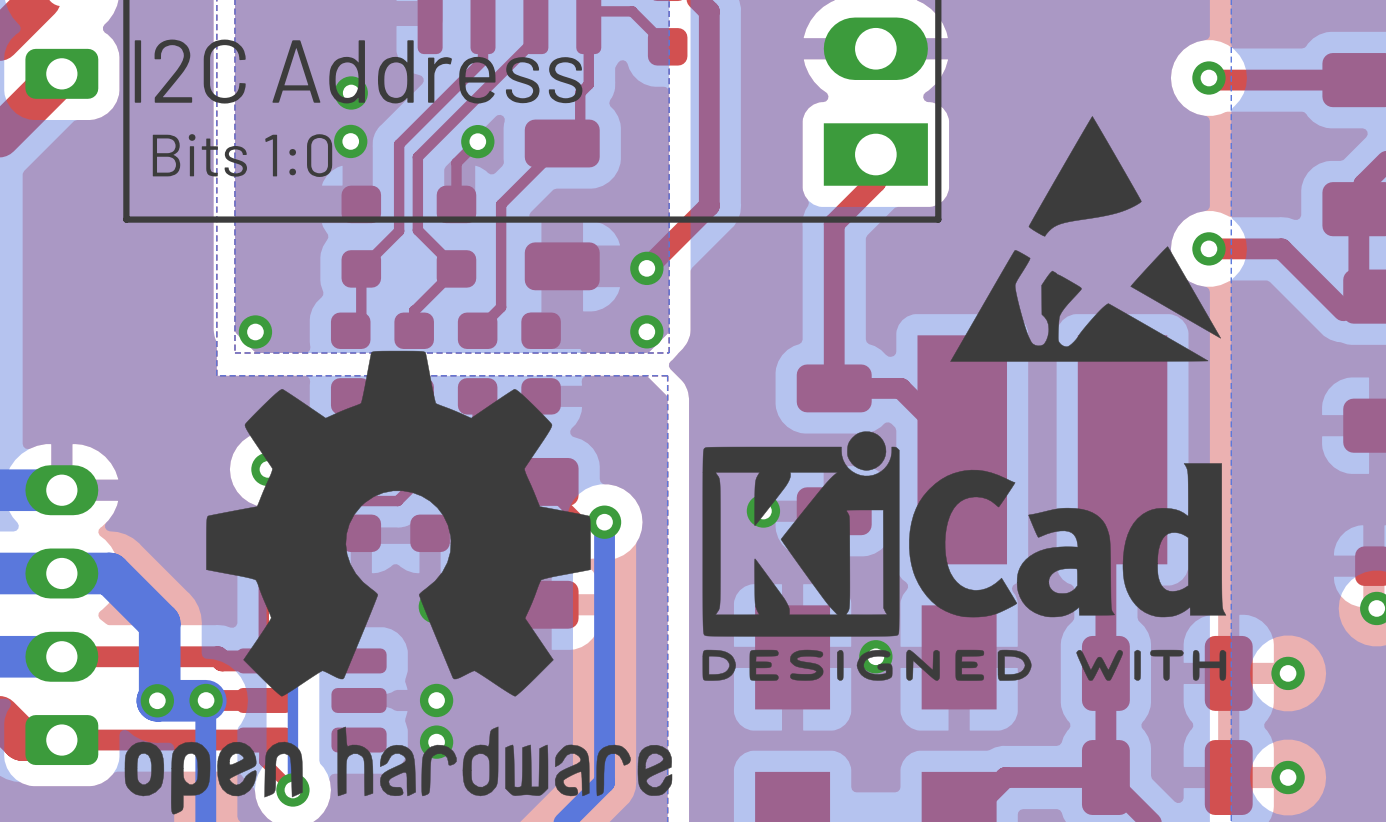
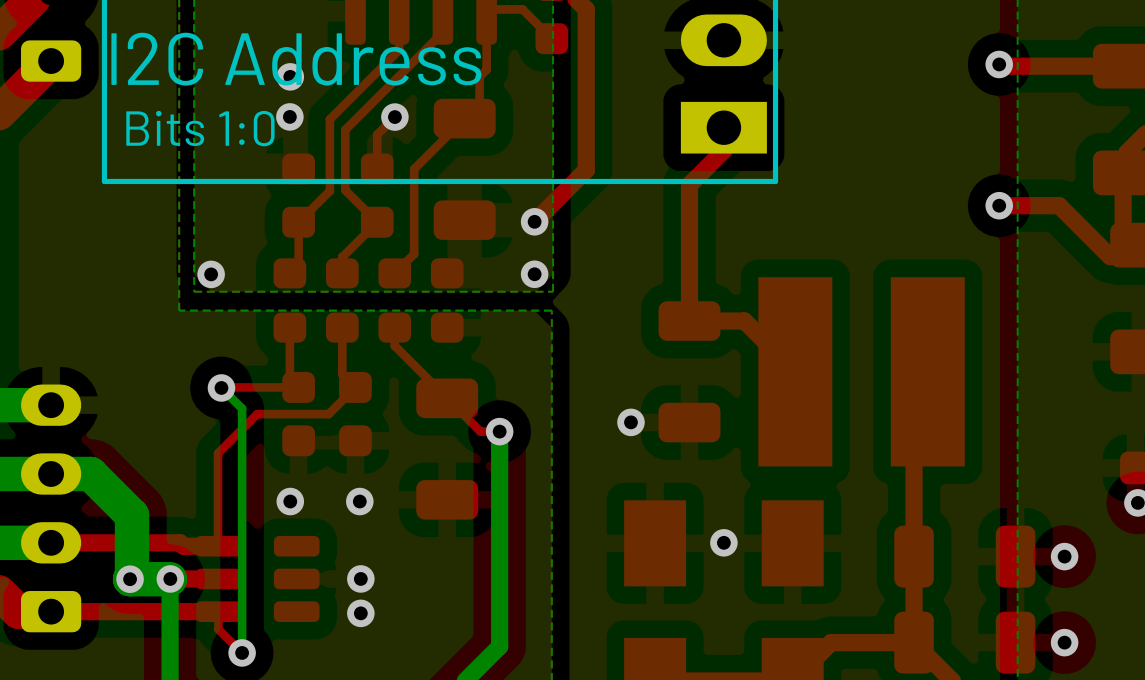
drawing: [950, 116, 1221, 362] -> none
drawing: [124, 350, 1227, 815] -> none

